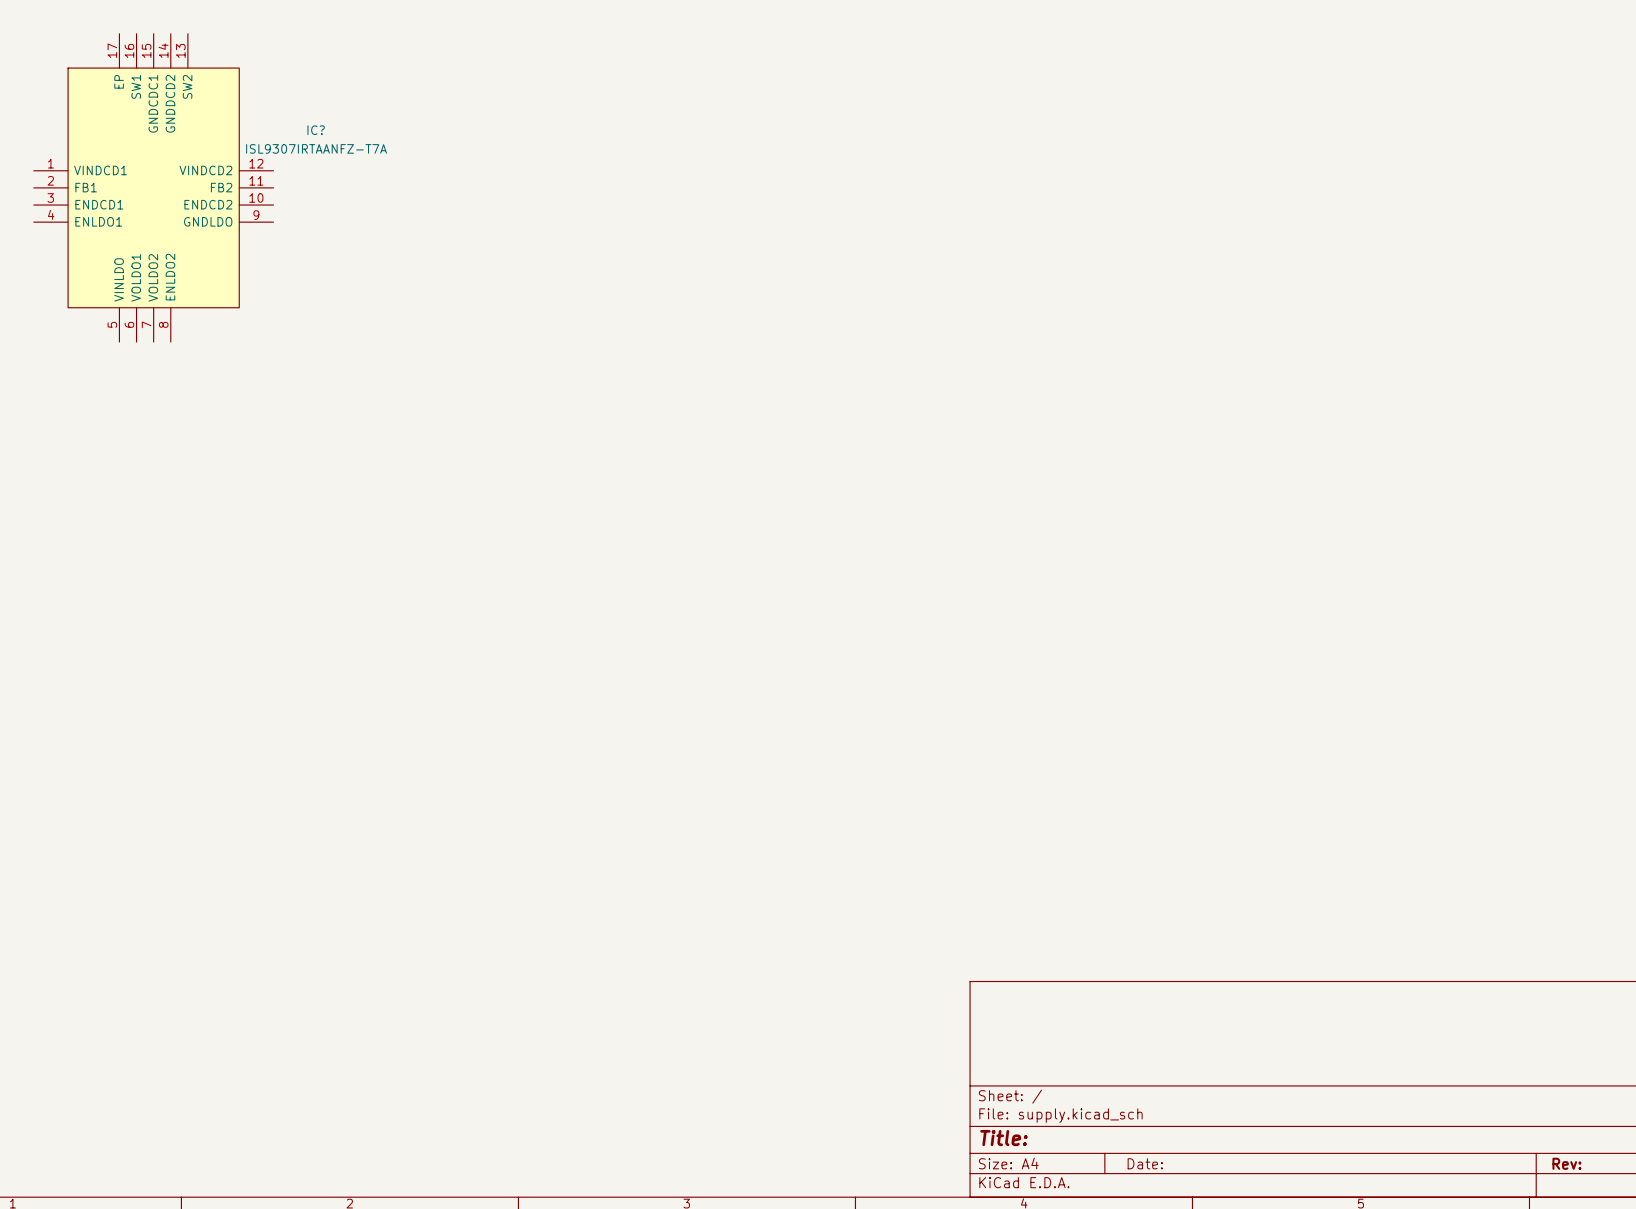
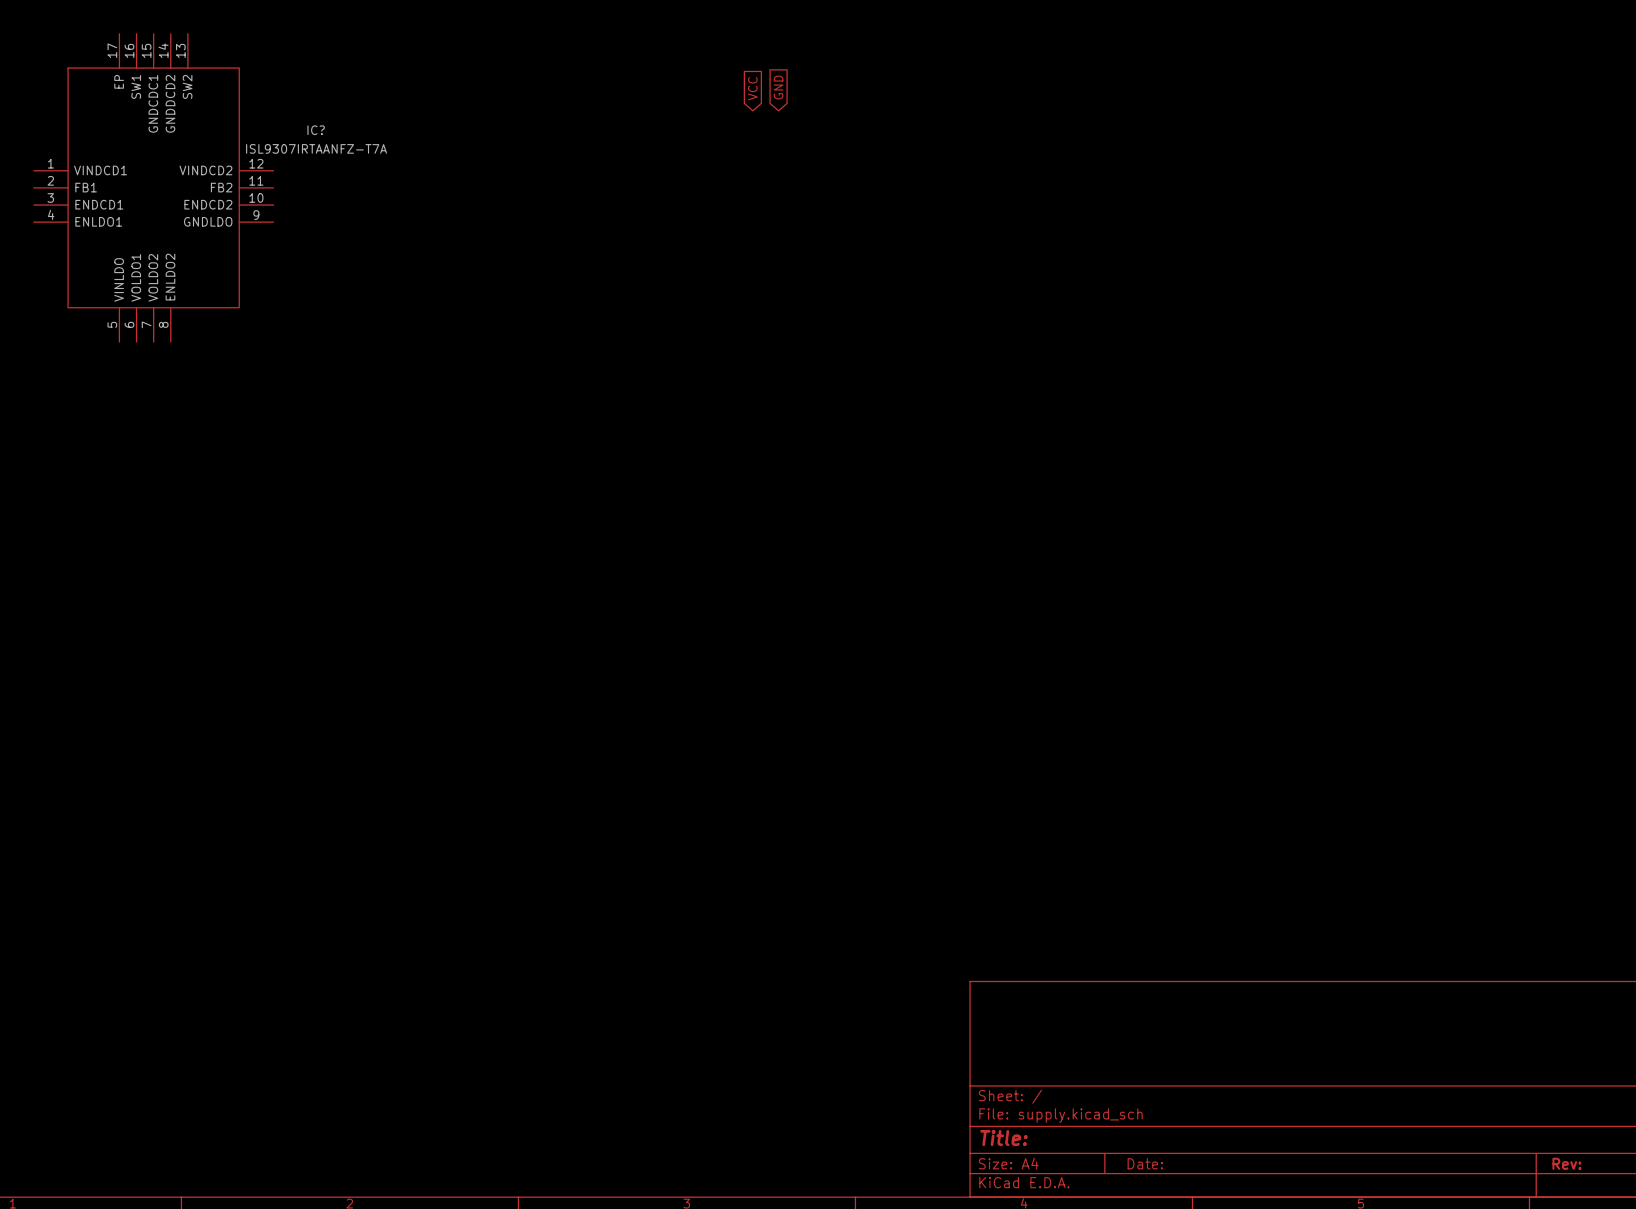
global label: none -> GND (778, 87)
global label: none -> VCC (752, 88)

